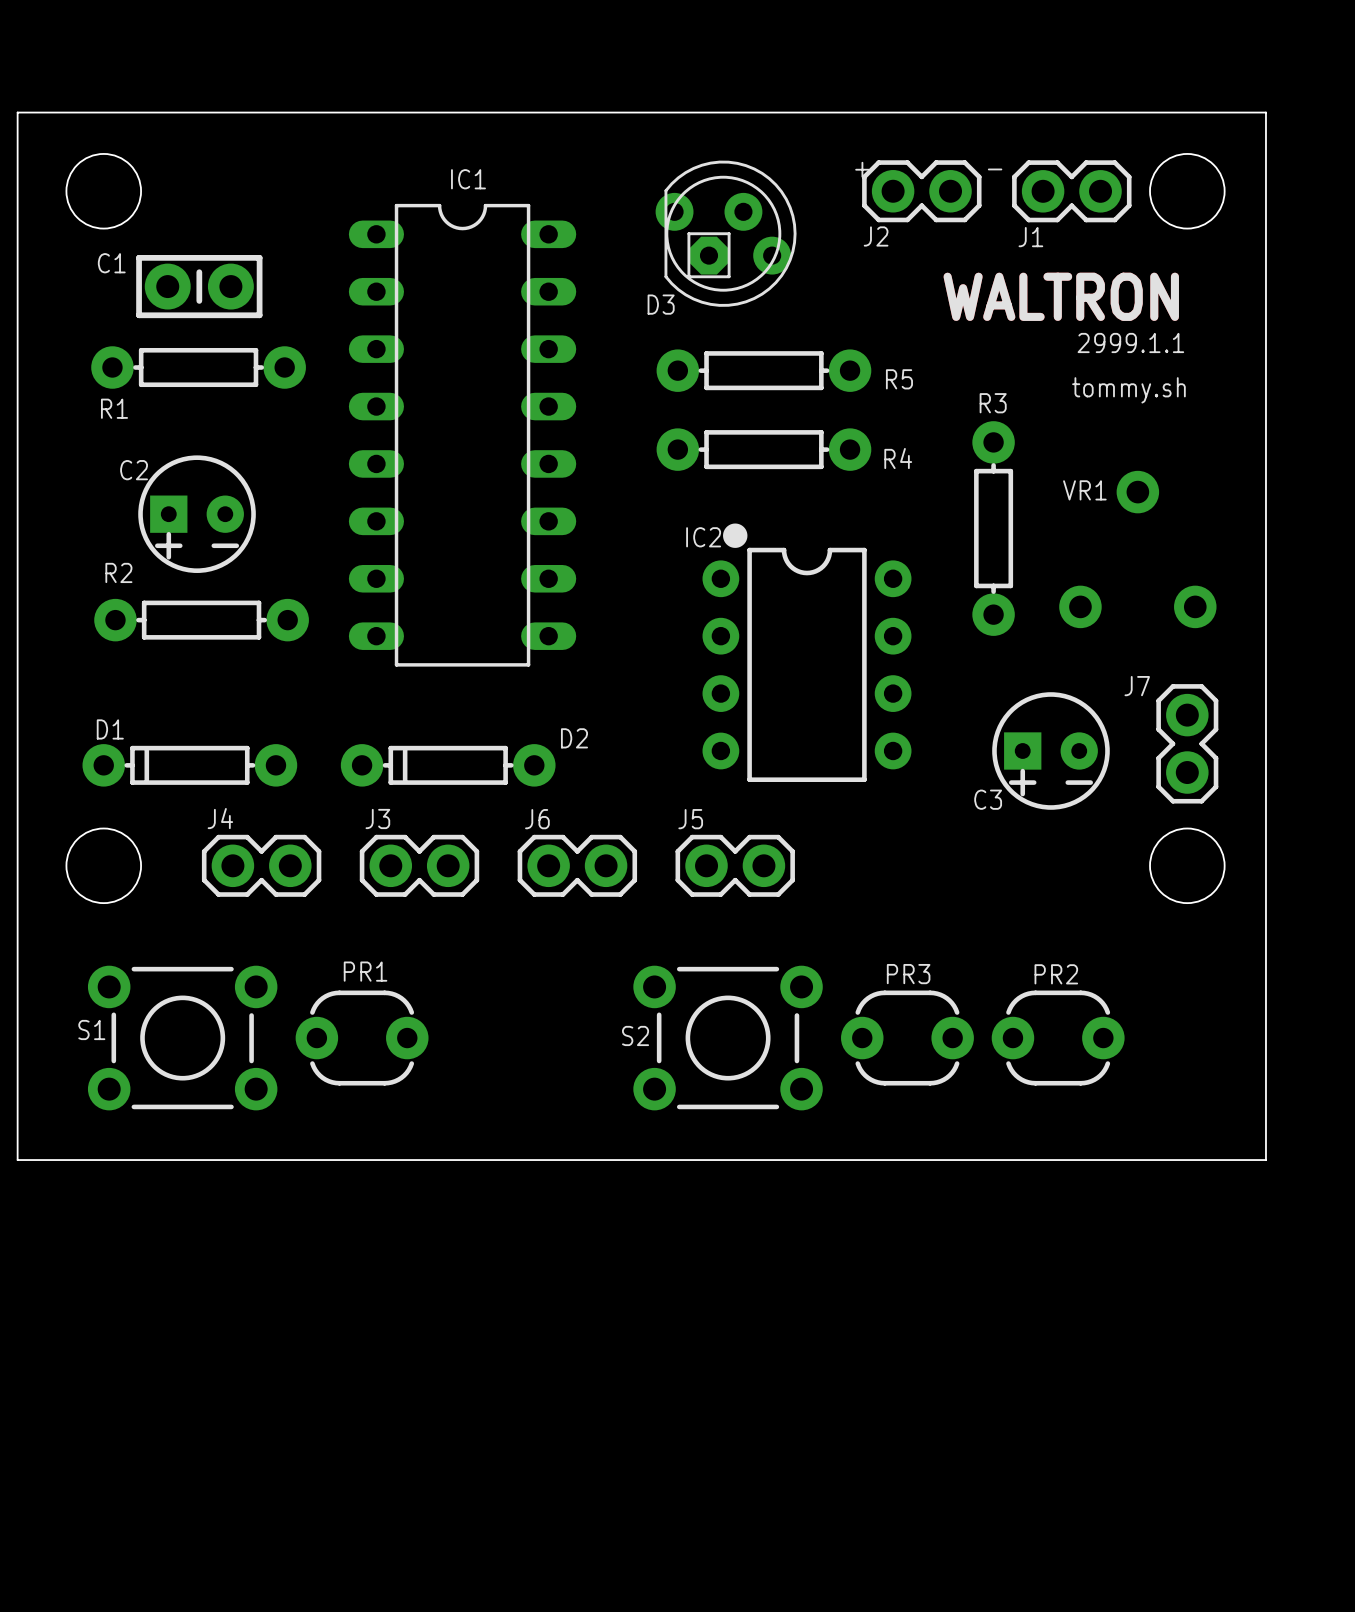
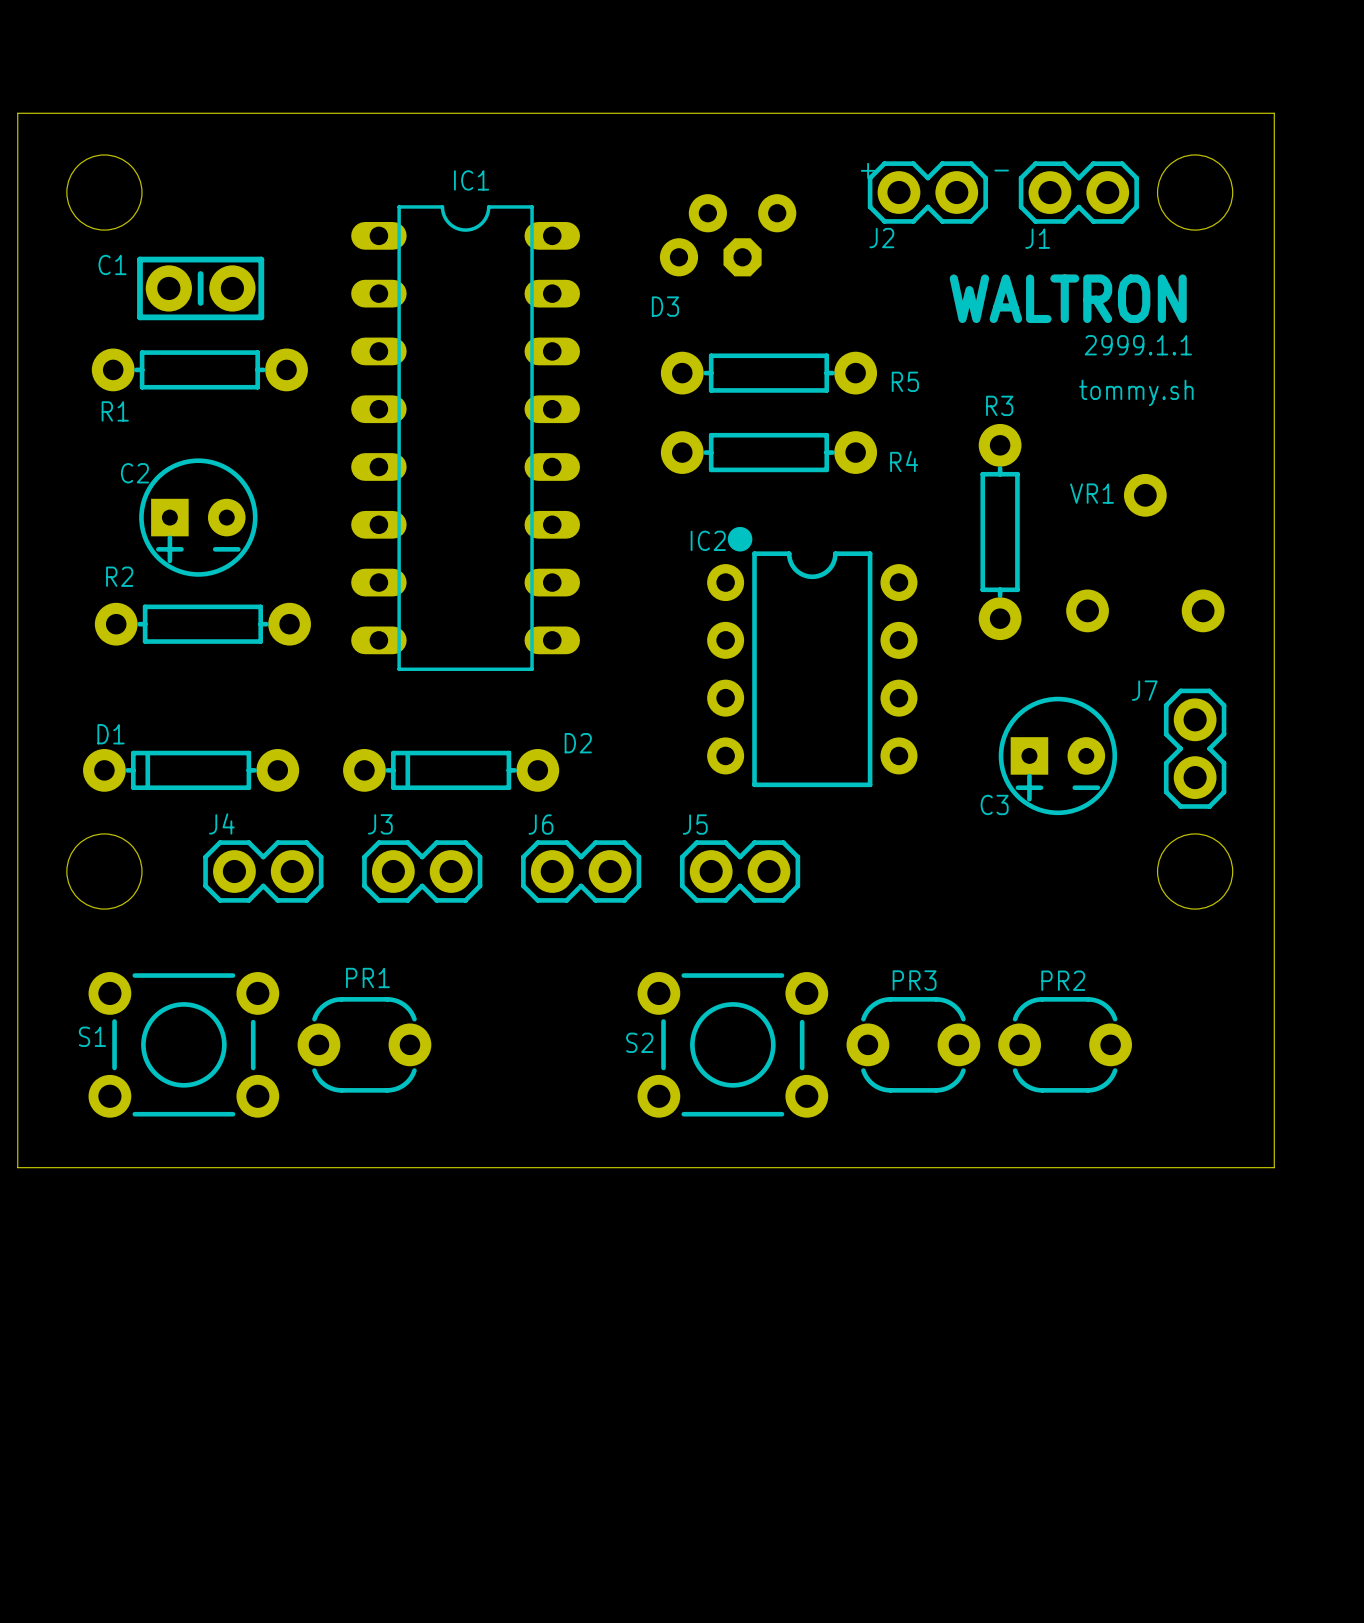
D3 footprint: [655, 160, 797, 307] -> [659, 194, 797, 277]

